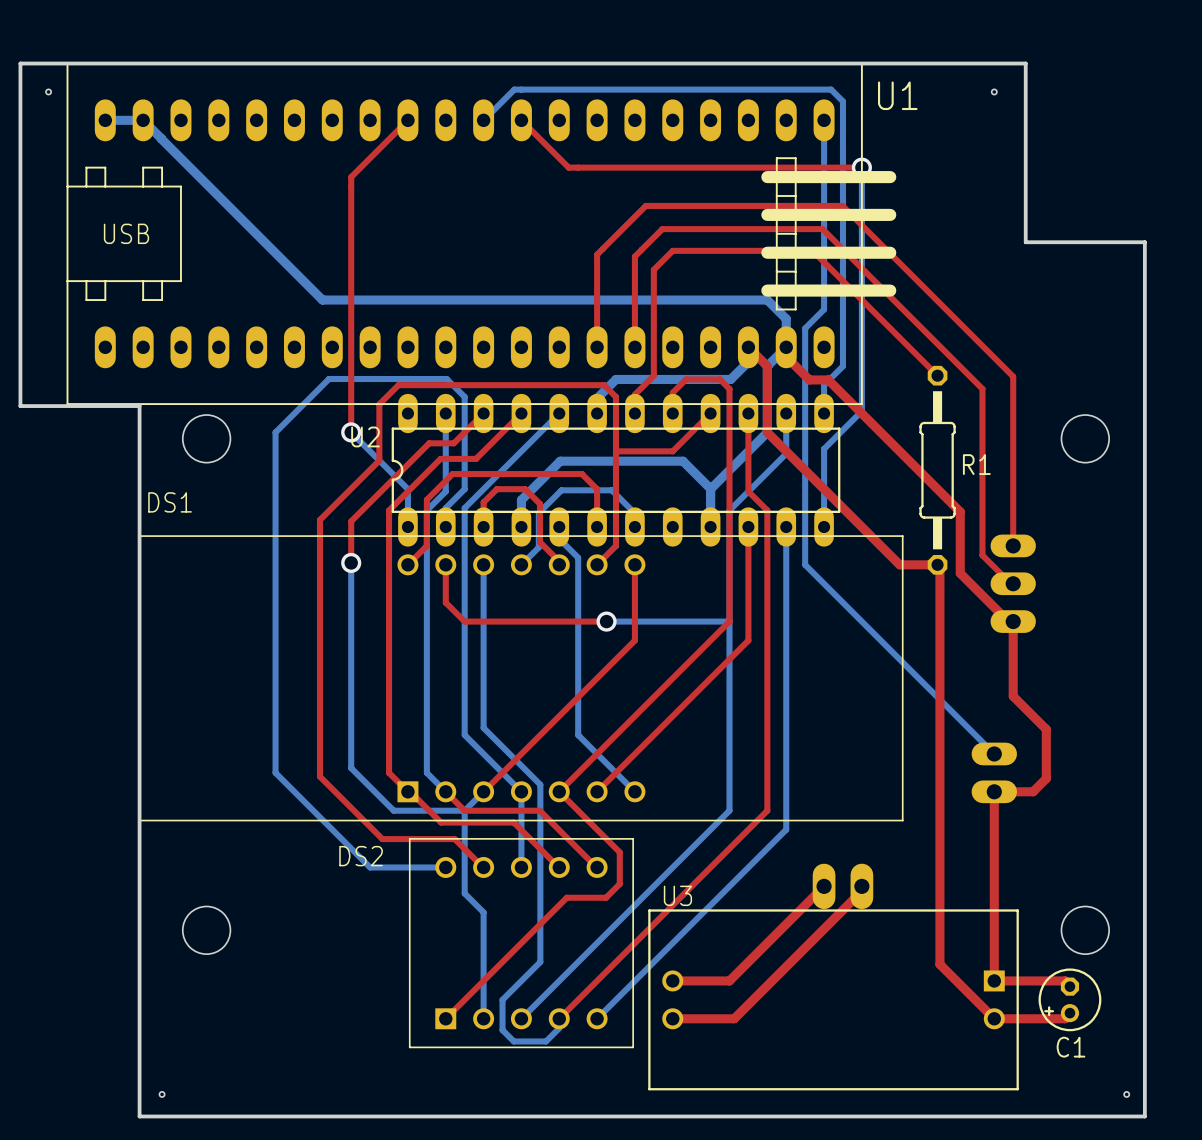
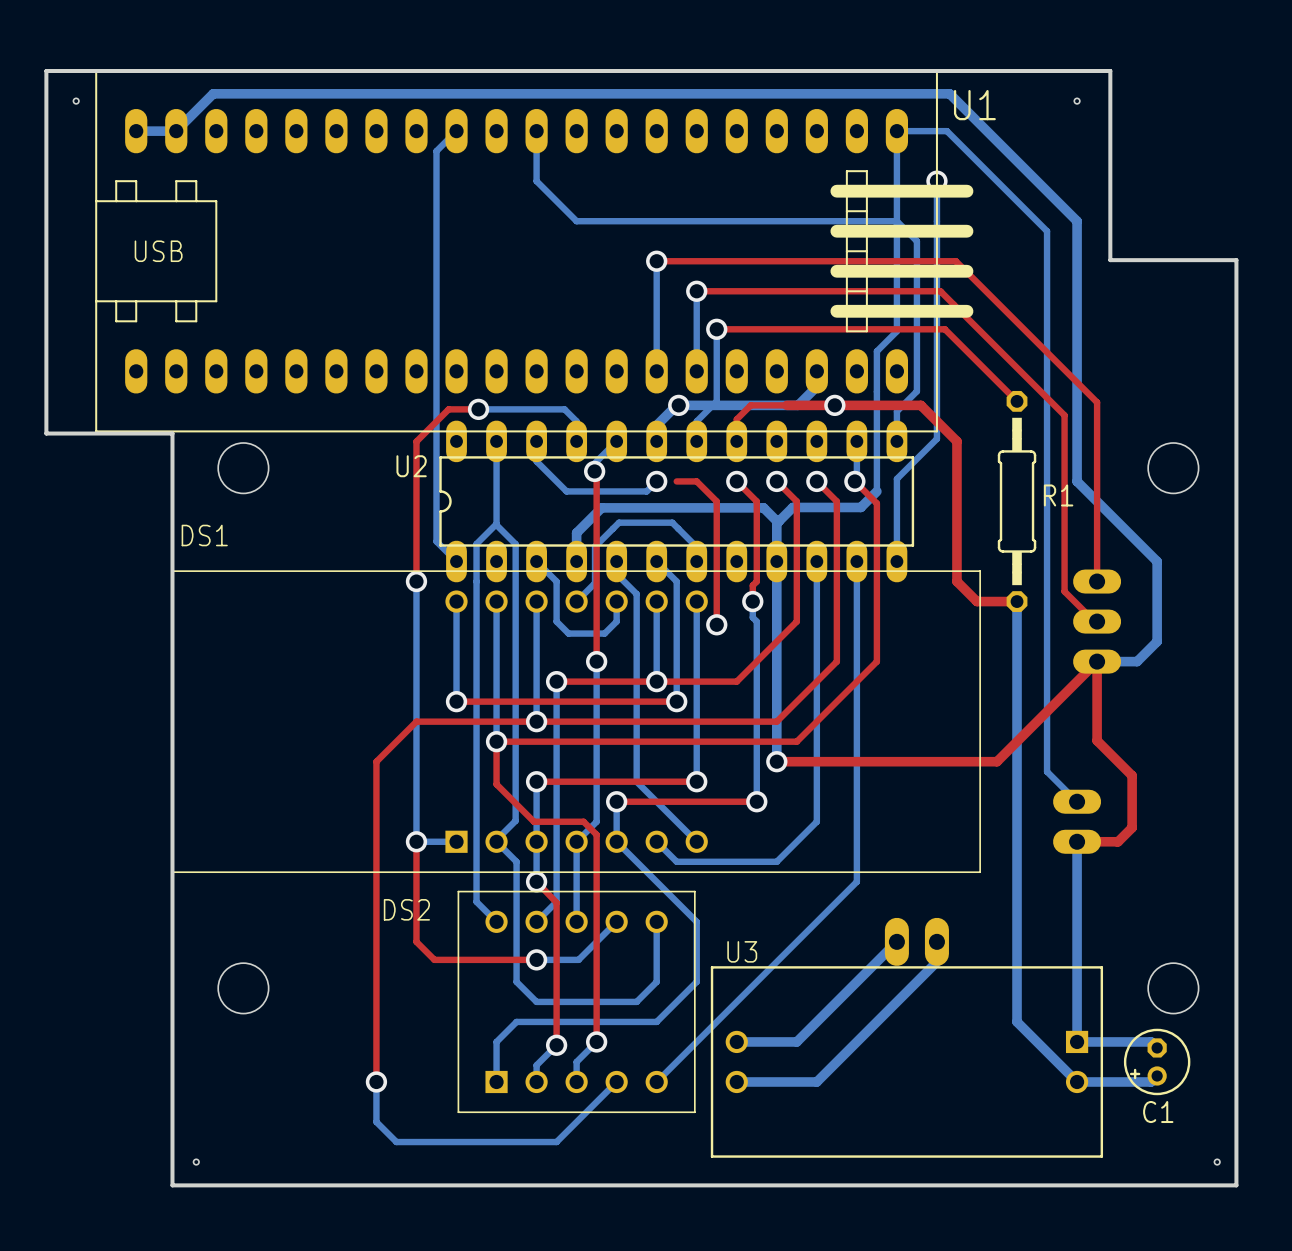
bottom track: (143, 120) (322, 300) (767, 300) (786, 318) (786, 347) (767, 366) (767, 432) (710, 489) -> (176, 131) (213, 93) (949, 93) (1077, 221) (1077, 481) (1157, 561) (1157, 641) (1137, 661) (1097, 661)
top track: (407, 120) (351, 177) (351, 432) -> none
bottom track: (483, 120) (514, 89) (831, 89) (842, 101) (842, 224) -> (536, 131) (536, 181) (576, 221) (896, 221) (916, 241)
top track: (521, 120) (568, 167) (861, 167) -> none
bottom track: none -> (656, 261) (656, 371)
via: none -> (656, 261)
top track: (879, 243) (842, 205) (645, 205) (597, 254) (597, 347) -> (955, 261) (656, 261)
bottom track: none -> (696, 291) (696, 371)
via: none -> (696, 291)
top track: (865, 271) (822, 229) (662, 229) (634, 256) (634, 347) -> (940, 291) (696, 291)
bottom track: none -> (716, 329) (716, 401) (696, 421) (696, 441)
via: none -> (716, 329)
top track: (869, 307) (812, 250) (672, 250) (653, 269) (653, 375) (634, 394) (634, 413) -> (944, 329) (716, 329)
top track: (748, 347) (767, 366) (767, 432) (880, 545) -> (786, 405) (920, 405) (956, 441) (956, 581)
top track: (786, 347) (786, 356) (809, 379) (828, 379) (960, 511) (960, 573) (1006, 619) (1013, 621) -> (776, 761) (997, 761) (1097, 661)
via: none -> (678, 405)
top track: (720, 379) (729, 388) (729, 470) -> (776, 481) (796, 501)
via: none -> (834, 405)
bottom track: none -> (478, 409) (564, 409) (576, 421) (576, 441)
top track: none -> (478, 409) (448, 409) (416, 441) (416, 581)
via: none -> (478, 409)
bottom track: none -> (536, 441) (536, 461) (566, 491) (646, 491) (656, 481)
top track: (483, 413) (453, 443) (429, 443) (351, 521) (351, 562) -> none
top track: (521, 413) (476, 458) (440, 458) (389, 510) (389, 772) (441, 822) (513, 822) (559, 867) -> none
top track: (710, 413) (672, 451) (634, 451) -> (716, 624) (716, 501) (696, 481)
top track: (748, 413) (748, 491) (767, 510) -> (816, 481) (836, 501) (836, 544)
bottom track: (351, 432) (407, 489) (407, 527) -> (456, 131) (436, 151) (436, 541) (456, 561)
via: (351, 432) -> none
bottom track: (538, 434) (464, 508) (464, 735) (521, 791) -> (596, 661) (596, 821) (576, 841)
top track: none -> (594, 471) (596, 473) (596, 661)
via: none -> (594, 471)
bottom track: (786, 449) (786, 453) (729, 510) (729, 810) (521, 1018) -> (596, 1041) (576, 1061) (576, 1081)
via: none -> (656, 481)
top track: none -> (736, 481) (756, 501) (756, 581) (752, 585) (752, 601)
via: none -> (736, 481)
via: none -> (776, 481)
via: none -> (816, 481)
top track: none -> (854, 481) (876, 503) (876, 661) (796, 741) (496, 741) (496, 784) (533, 821) (583, 821) (596, 834) (596, 1041)
via: none -> (854, 481)
bottom track: (805, 460) (805, 564) (965, 725) -> (896, 131) (946, 131) (1047, 231) (1047, 771)
bottom track: none -> (876, 491) (860, 507) (792, 507) (779, 521) (776, 521)
bottom track: (545, 476) (560, 461) (682, 461) (698, 476) -> (601, 507) (763, 507)
bottom track: none -> (496, 523) (515, 544) (515, 820) (496, 841) (516, 861)
bottom track: (445, 527) (445, 508) (464, 489) (464, 396) (446, 379) (328, 379) (275, 432) (275, 772) (370, 867) (445, 867) -> none
bottom track: none -> (536, 561) (556, 581) (556, 621) (568, 633) (604, 633) (616, 621) (616, 601)
top track: (483, 527) (483, 502) (496, 489) (525, 489) (539, 503) (539, 542) (559, 561) (559, 564) -> none
bottom track: none -> (656, 561) (676, 581) (676, 701)
top track: (597, 527) (597, 489) (581, 474) (452, 474) (426, 499) (426, 545) (407, 564) -> none
bottom track: none -> (776, 561) (776, 761)
bottom track: none -> (816, 561) (816, 821) (776, 861) (676, 861) (656, 841)
top track: (748, 527) (748, 640) -> (836, 661) (816, 681)
bottom track: none -> (416, 581) (416, 841) (456, 841)
bottom track: (351, 562) (351, 768) (393, 810) (464, 810) (483, 791) -> none
via position: (351, 562) -> (416, 581)
bottom track: none -> (456, 601) (456, 701)
bottom track: none -> (496, 601) (496, 741)
top track: (445, 564) (445, 602) (464, 621) (606, 621) -> none
bottom track: none -> (656, 601) (656, 681)
top track: (597, 564) (616, 545) (616, 396) (604, 385) (398, 385) (379, 404) (379, 460) (320, 519) (320, 776) (382, 839) (454, 839) (483, 867) -> none
bottom track: none -> (696, 601) (696, 781)
top track: (634, 564) (634, 640) (483, 791) -> none
bottom track: none -> (752, 601) (752, 617) (756, 621) (756, 801)
via: none -> (752, 601)
bottom track: none -> (1017, 601) (1017, 1021) (1077, 1081) (1151, 1081) (1157, 1075)
top track: (937, 564) (939, 567) (939, 964) (994, 1018) (1065, 1018) (1069, 1013) -> none
top track: (729, 583) (729, 621) (559, 791) (619, 852) (619, 884) (606, 897) (566, 897) (445, 1018) -> (796, 621) (736, 681) (556, 681)
via: none -> (716, 624)
via: none -> (596, 661)
bottom track: (606, 621) (729, 621) -> none
via: (606, 621) -> none
top track: (767, 621) (767, 810) (559, 1018) -> none
bottom track: none -> (556, 681) (556, 901) (536, 921)
via: none -> (556, 681)
via: none -> (656, 681)
top track: none -> (456, 701) (676, 701)
via: none -> (456, 701)
via: none -> (676, 701)
bottom track: (483, 678) (483, 727) (540, 784) (540, 962) (502, 999) (502, 1030) (513, 1041) (546, 1041) (559, 1028) (559, 1018) -> (376, 1081) (376, 1122) (396, 1142) (556, 1142) (616, 1081)
via: none -> (536, 721)
top track: (710, 678) (597, 791) -> (776, 721) (416, 721) (376, 761) (376, 1081)
via: none -> (496, 741)
via: none -> (776, 761)
bottom track: none -> (536, 781) (536, 881)
top track: none -> (536, 781) (696, 781)
via: none -> (536, 781)
via: none -> (696, 781)
bottom track: none -> (616, 801) (616, 841) (696, 921) (696, 981) (656, 1021) (516, 1021) (496, 1041) (496, 1081)
top track: none -> (616, 801) (756, 801)
via: none -> (616, 801)
via: none -> (756, 801)
bottom track: (426, 772) (445, 791) -> (476, 821) (476, 901) (496, 921)
top track: none -> (416, 841) (416, 941) (434, 959) (536, 959)
via: none -> (416, 841)
top track: (445, 791) (464, 810) (539, 810) (597, 867) -> none
bottom track: none -> (1077, 841) (1077, 1041) (1151, 1041) (1157, 1047)
top track: (994, 791) (994, 980) (1065, 980) (1069, 986) -> none
top track: none -> (536, 881) (556, 902) (556, 1045)
via: none -> (536, 881)
bottom track: none -> (616, 921) (578, 959) (536, 959)
bottom track: none -> (656, 921) (656, 981) (636, 1001) (536, 1001) (516, 981) (516, 949)
bottom track: none -> (896, 941) (796, 1041) (736, 1041)
top track: (824, 886) (729, 980) (672, 980) -> none
bottom track: none -> (936, 941) (936, 961) (816, 1081) (736, 1081)
top track: (861, 886) (861, 891) (734, 1018) (672, 1018) -> none
bottom track: (464, 893) (483, 912) (483, 1003) -> (556, 1045) (536, 1065)
via: none -> (536, 959)
via: none -> (596, 1041)
via: none -> (556, 1045)
via: none -> (376, 1081)

